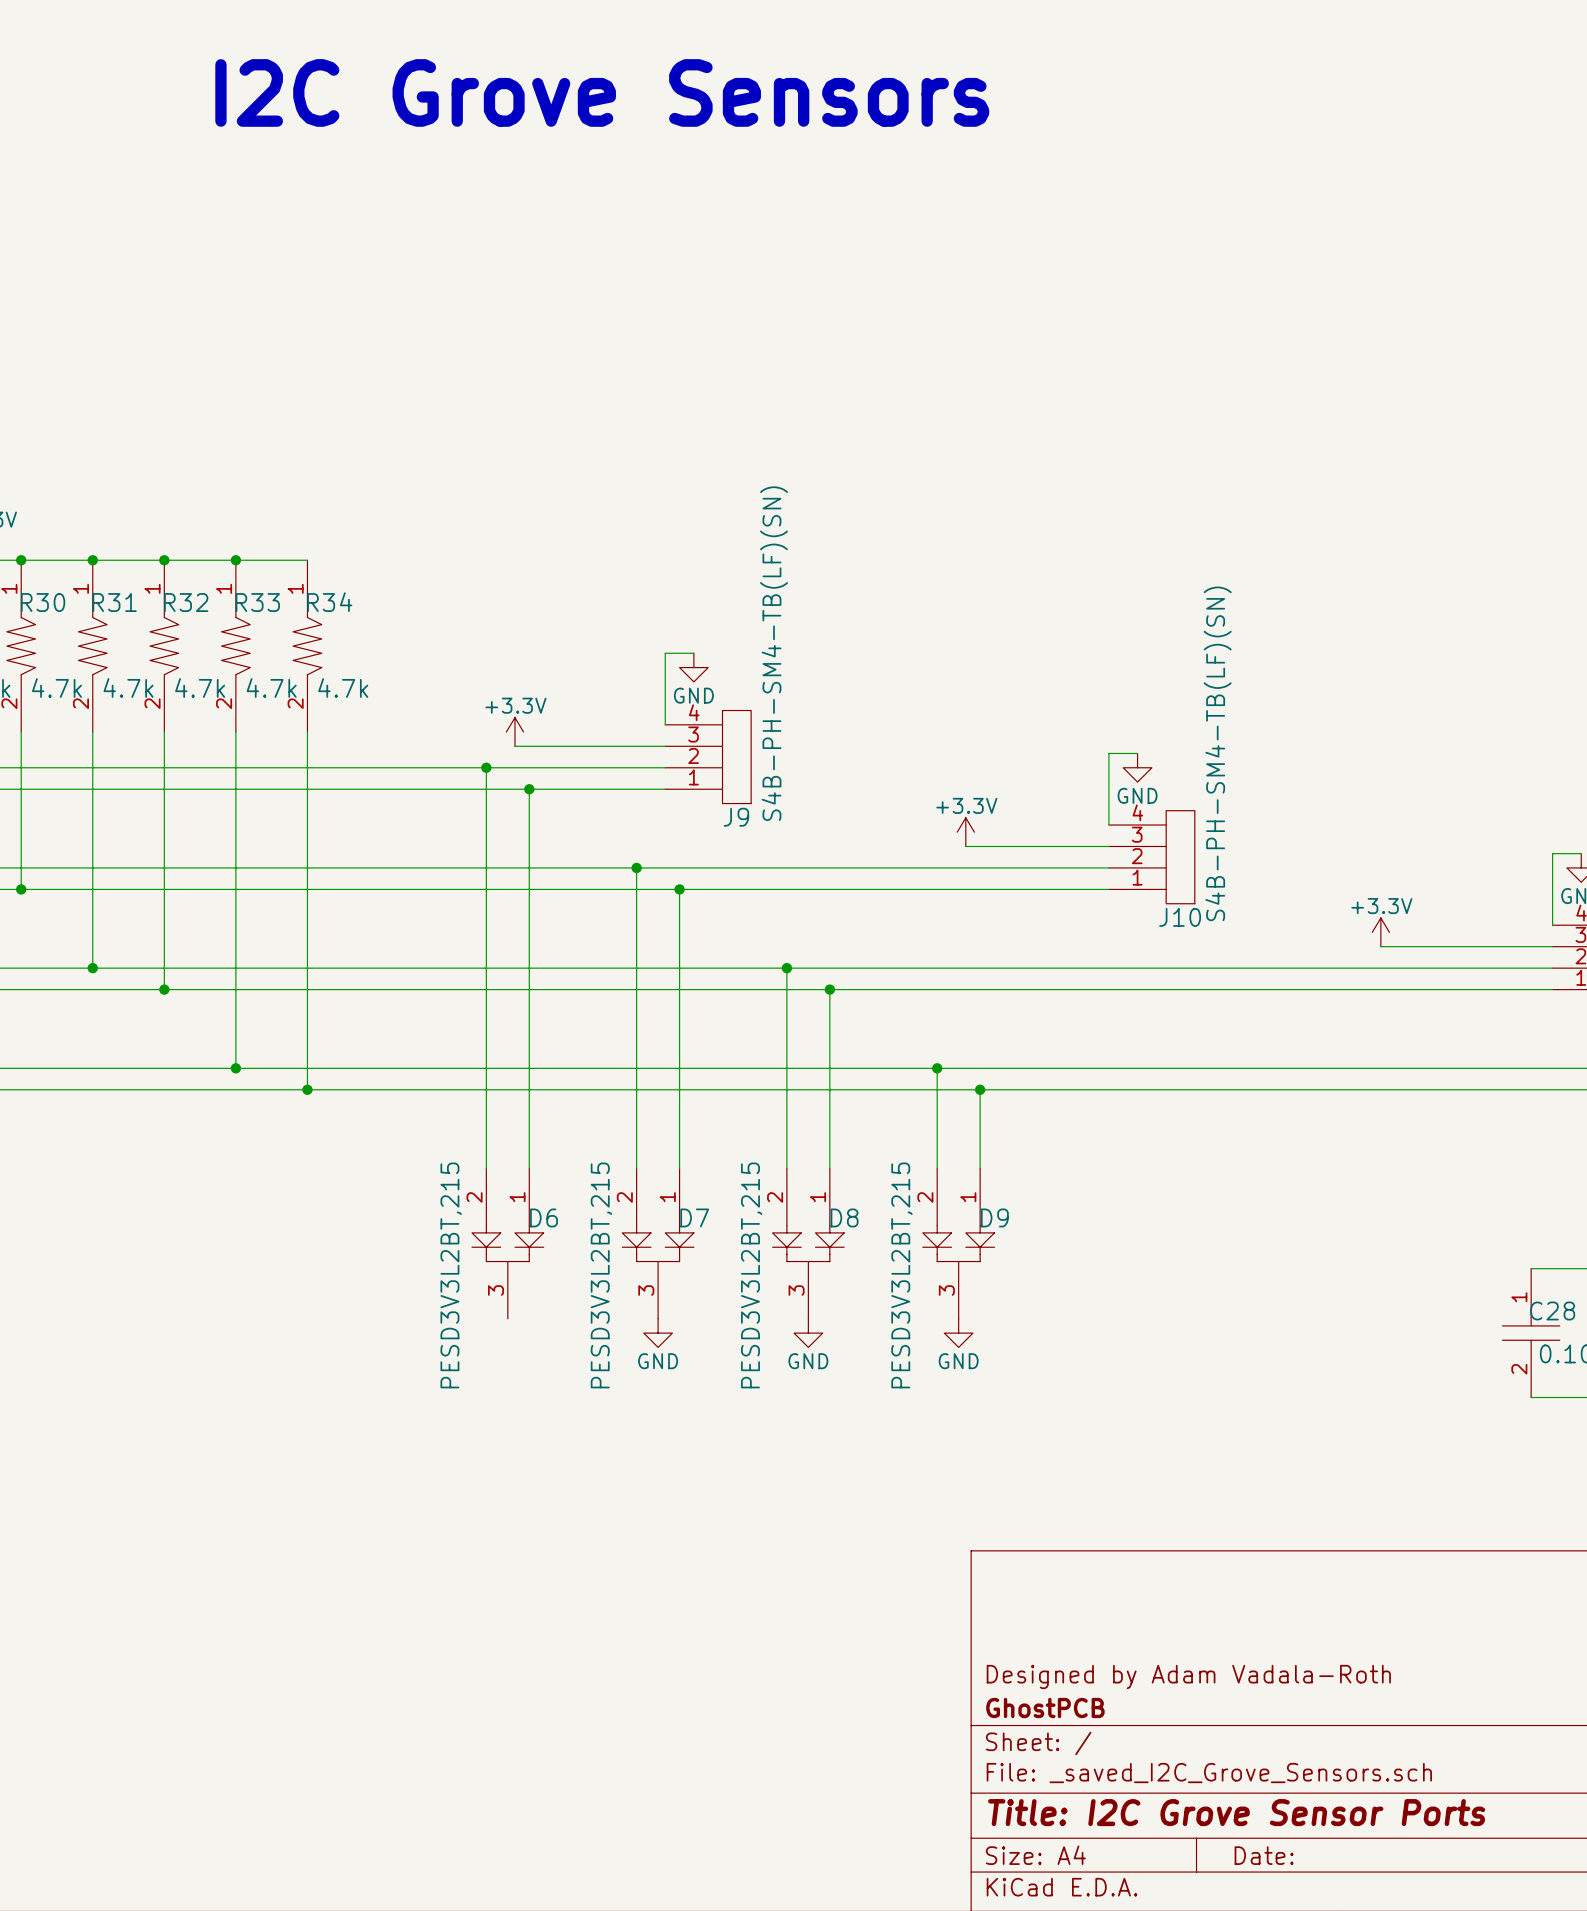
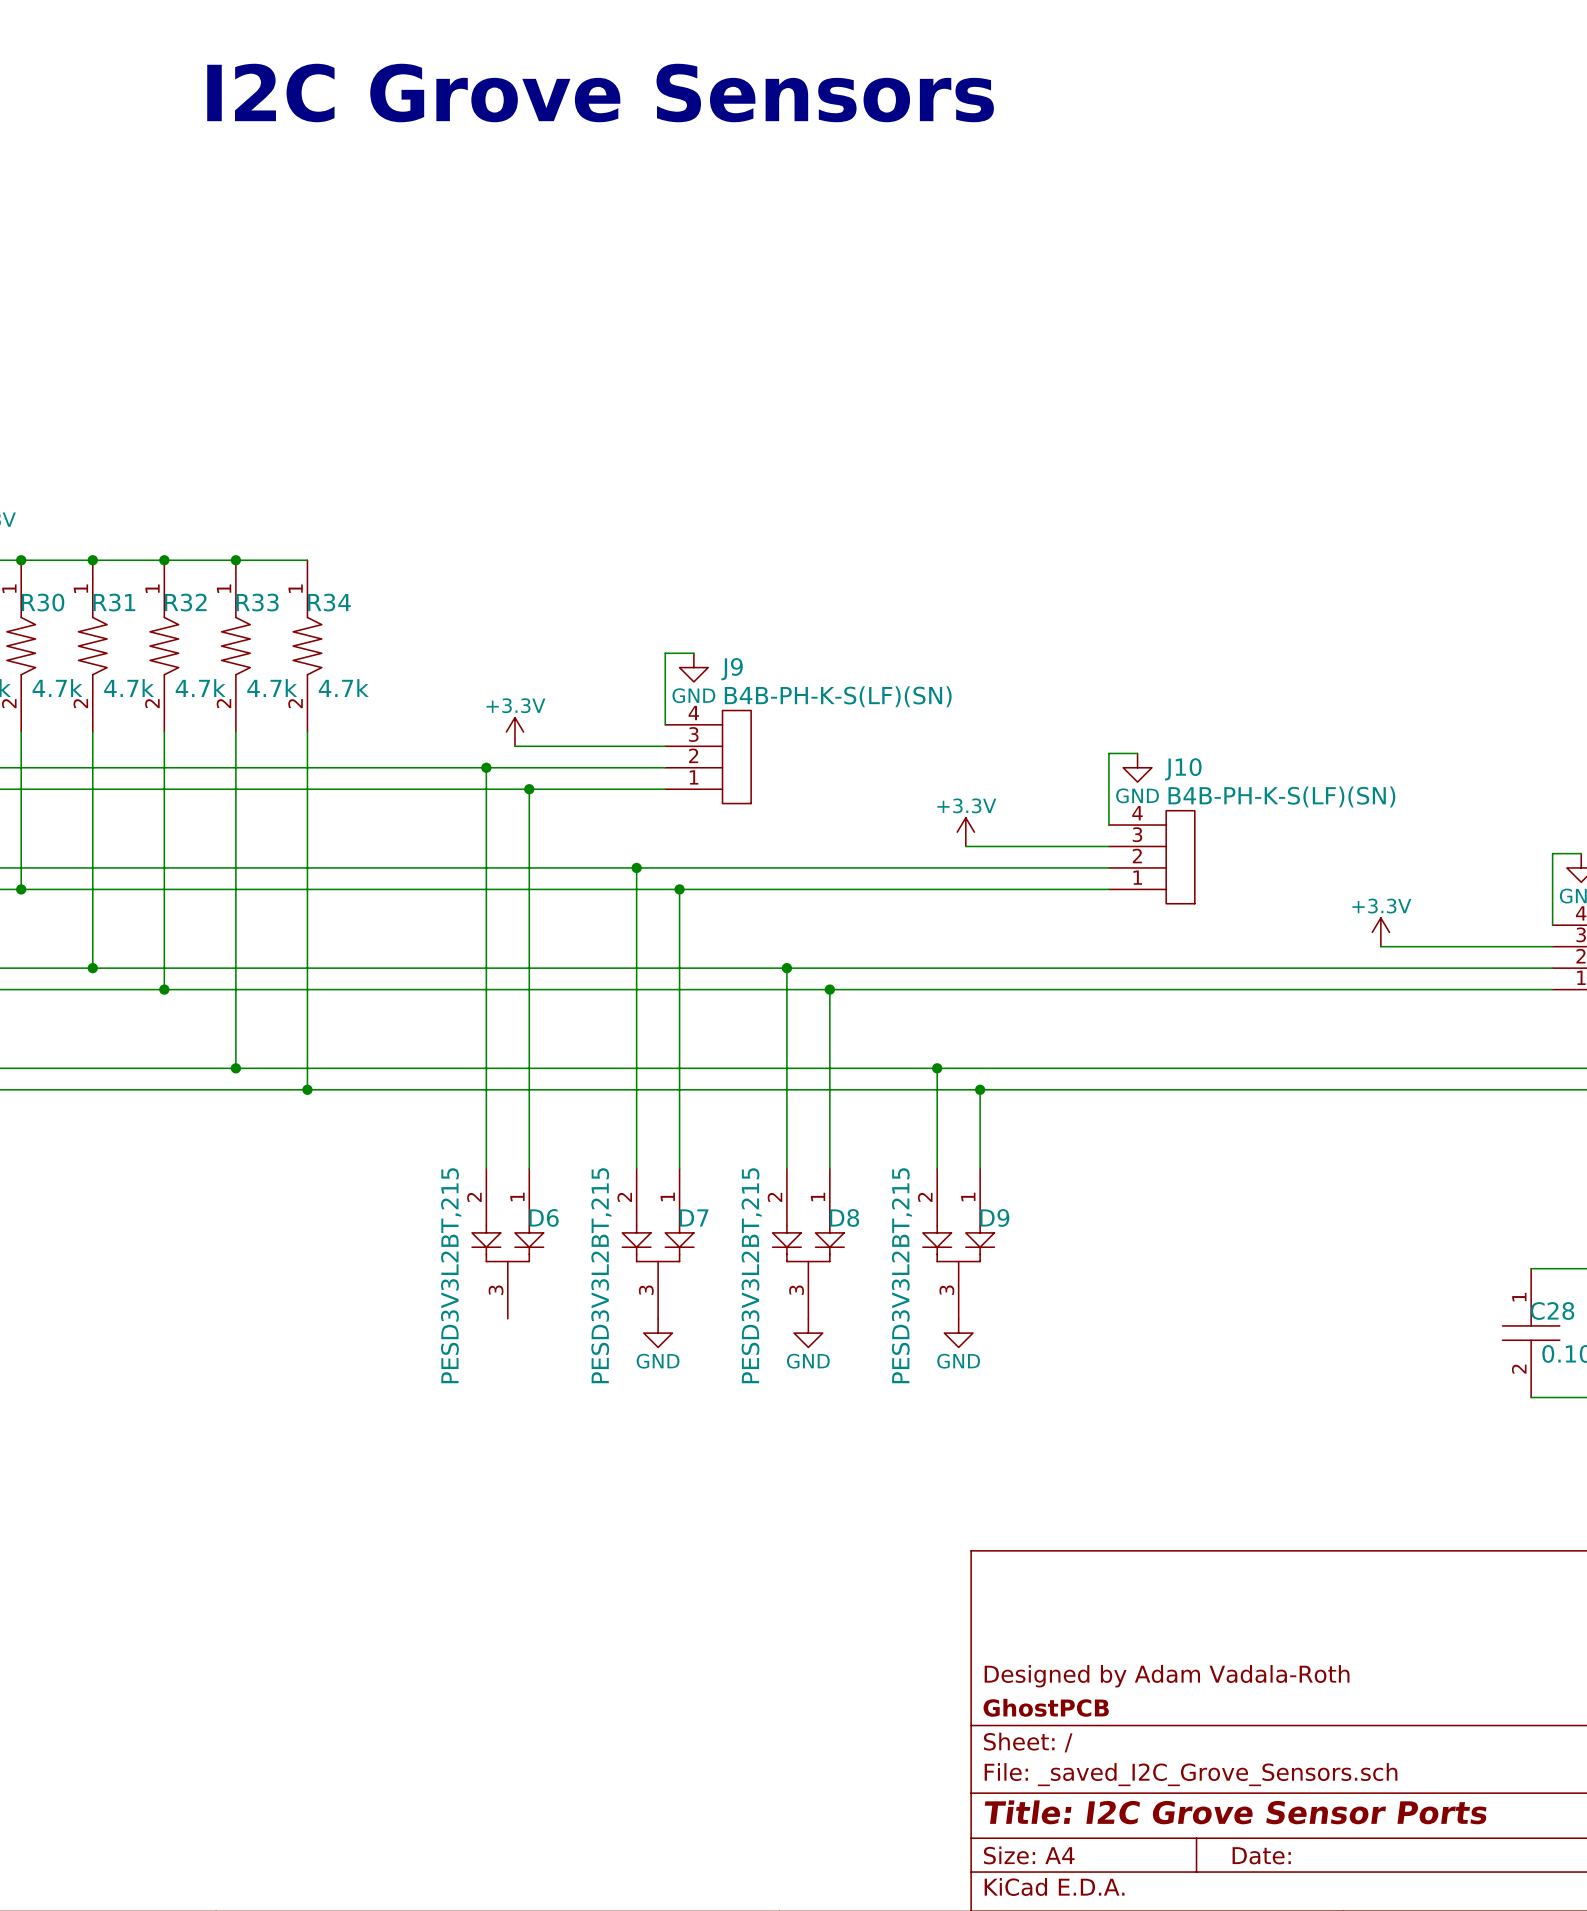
J9 value: S4B-PH-SM4-TB(LF)(SN) (774, 653) -> B4B-PH-K-S(LF)(SN) (838, 696)
J10 value: S4B-PH-SM4-TB(LF)(SN) (1217, 753) -> B4B-PH-K-S(LF)(SN) (1281, 796)
J9 name position: J9 (736, 817) -> J9 (732, 669)
J10 name position: J10 (1180, 917) -> J10 (1183, 769)

